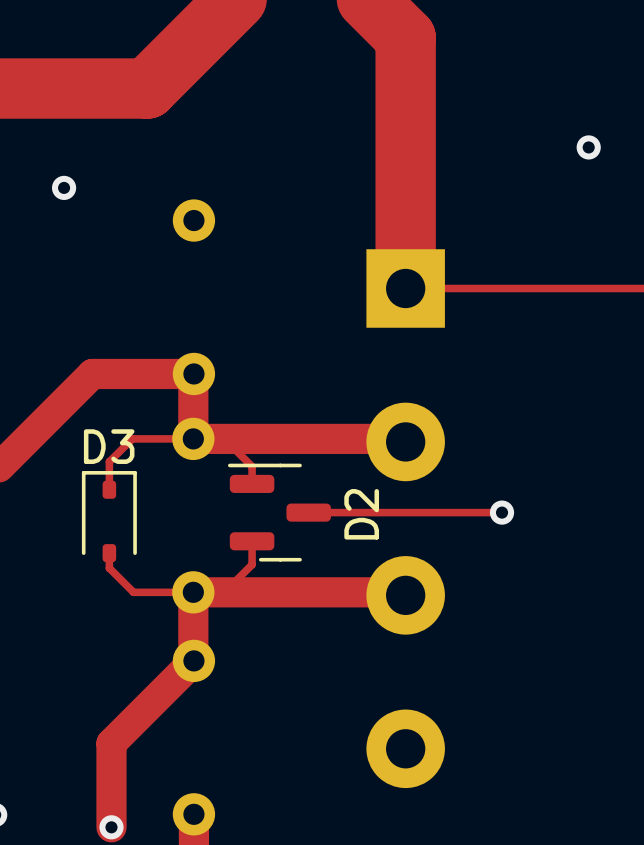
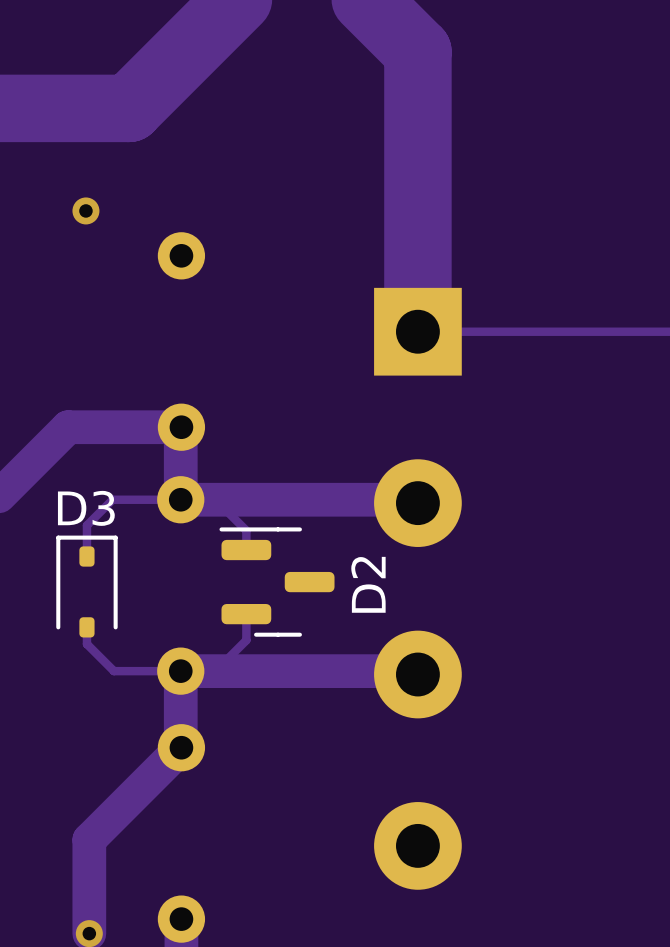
via: (588, 147) -> none
via position: (64, 187) -> (85, 210)
track: (308, 512) (502, 512) -> none
via: (502, 512) -> none

